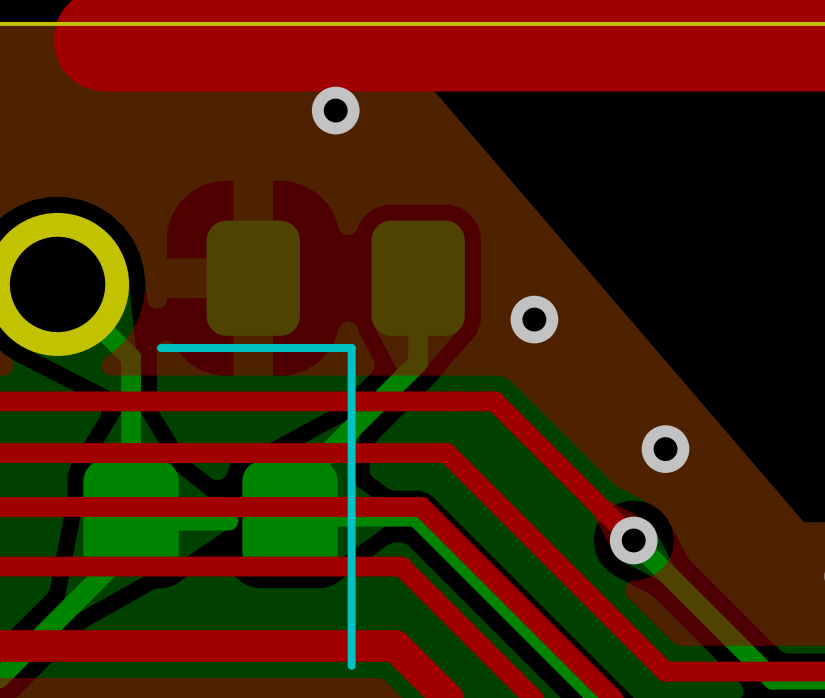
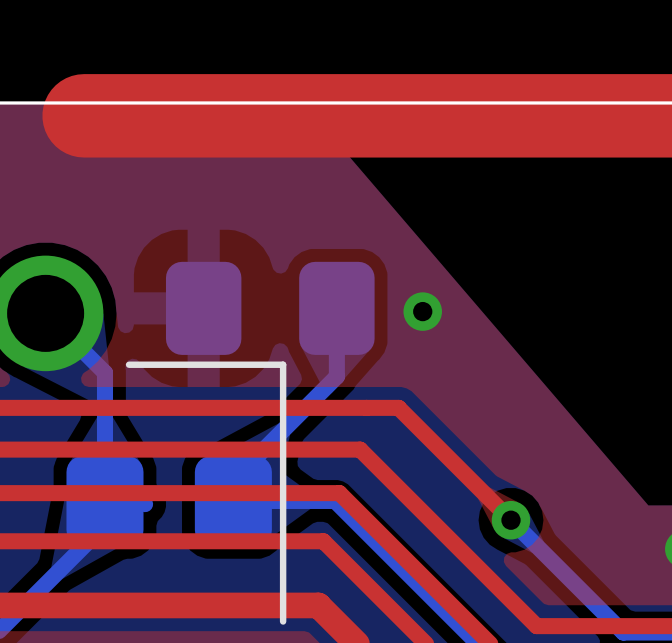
via: (335, 110) -> none
via position: (534, 319) -> (422, 311)
via: (665, 449) -> none
bottom track: (180, 520) (228, 520) -> none

